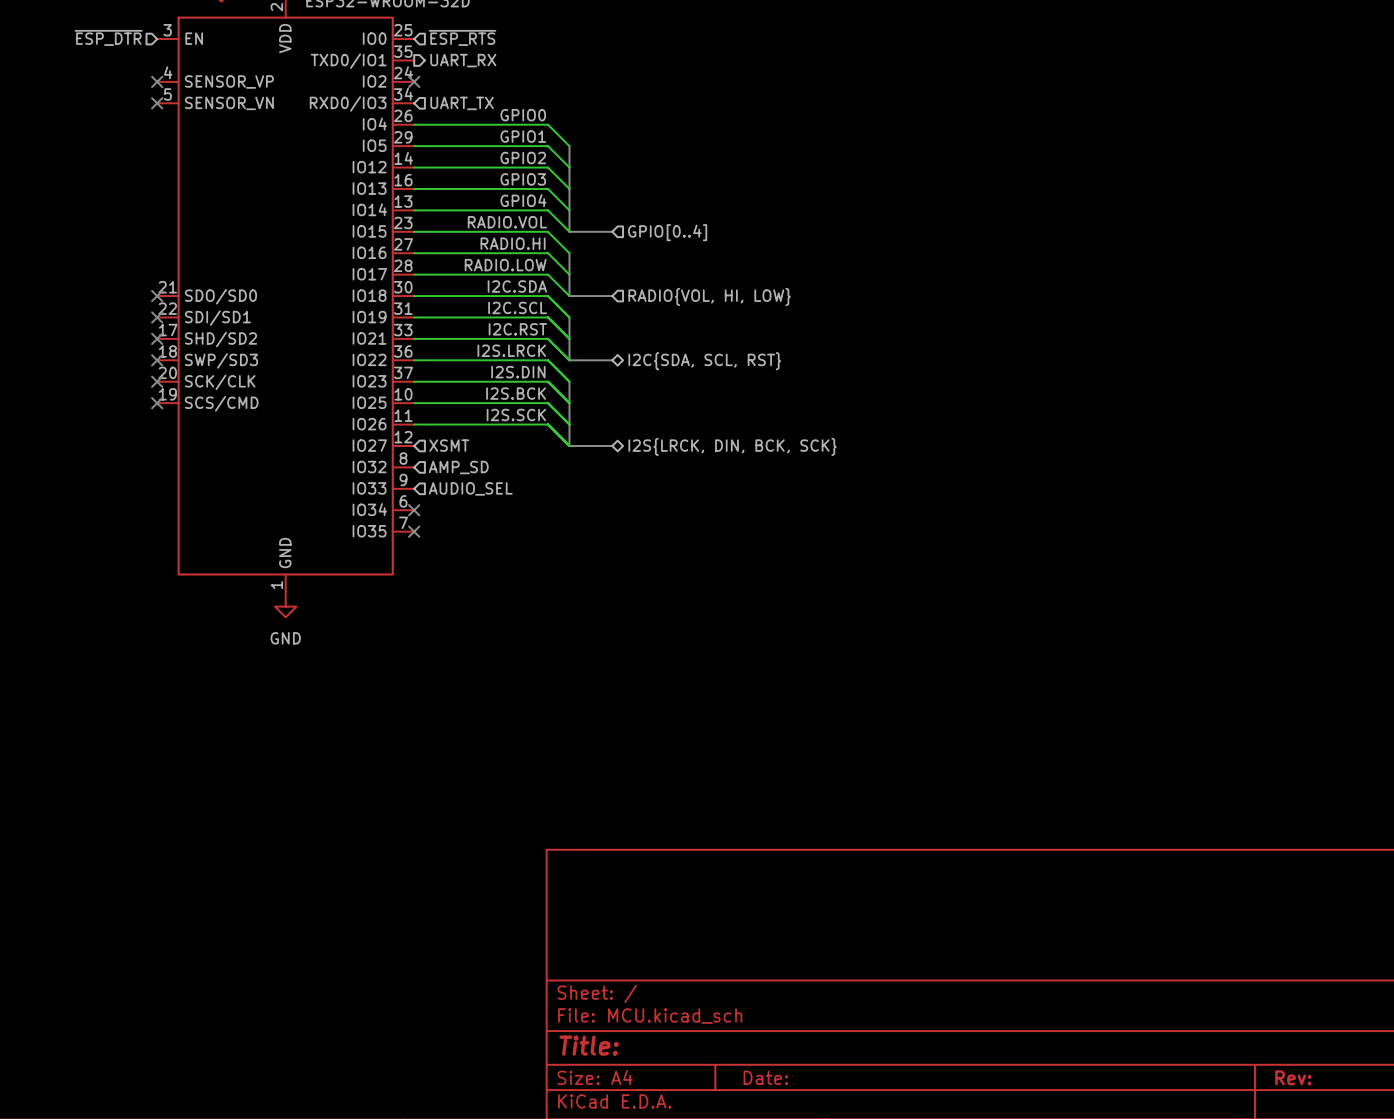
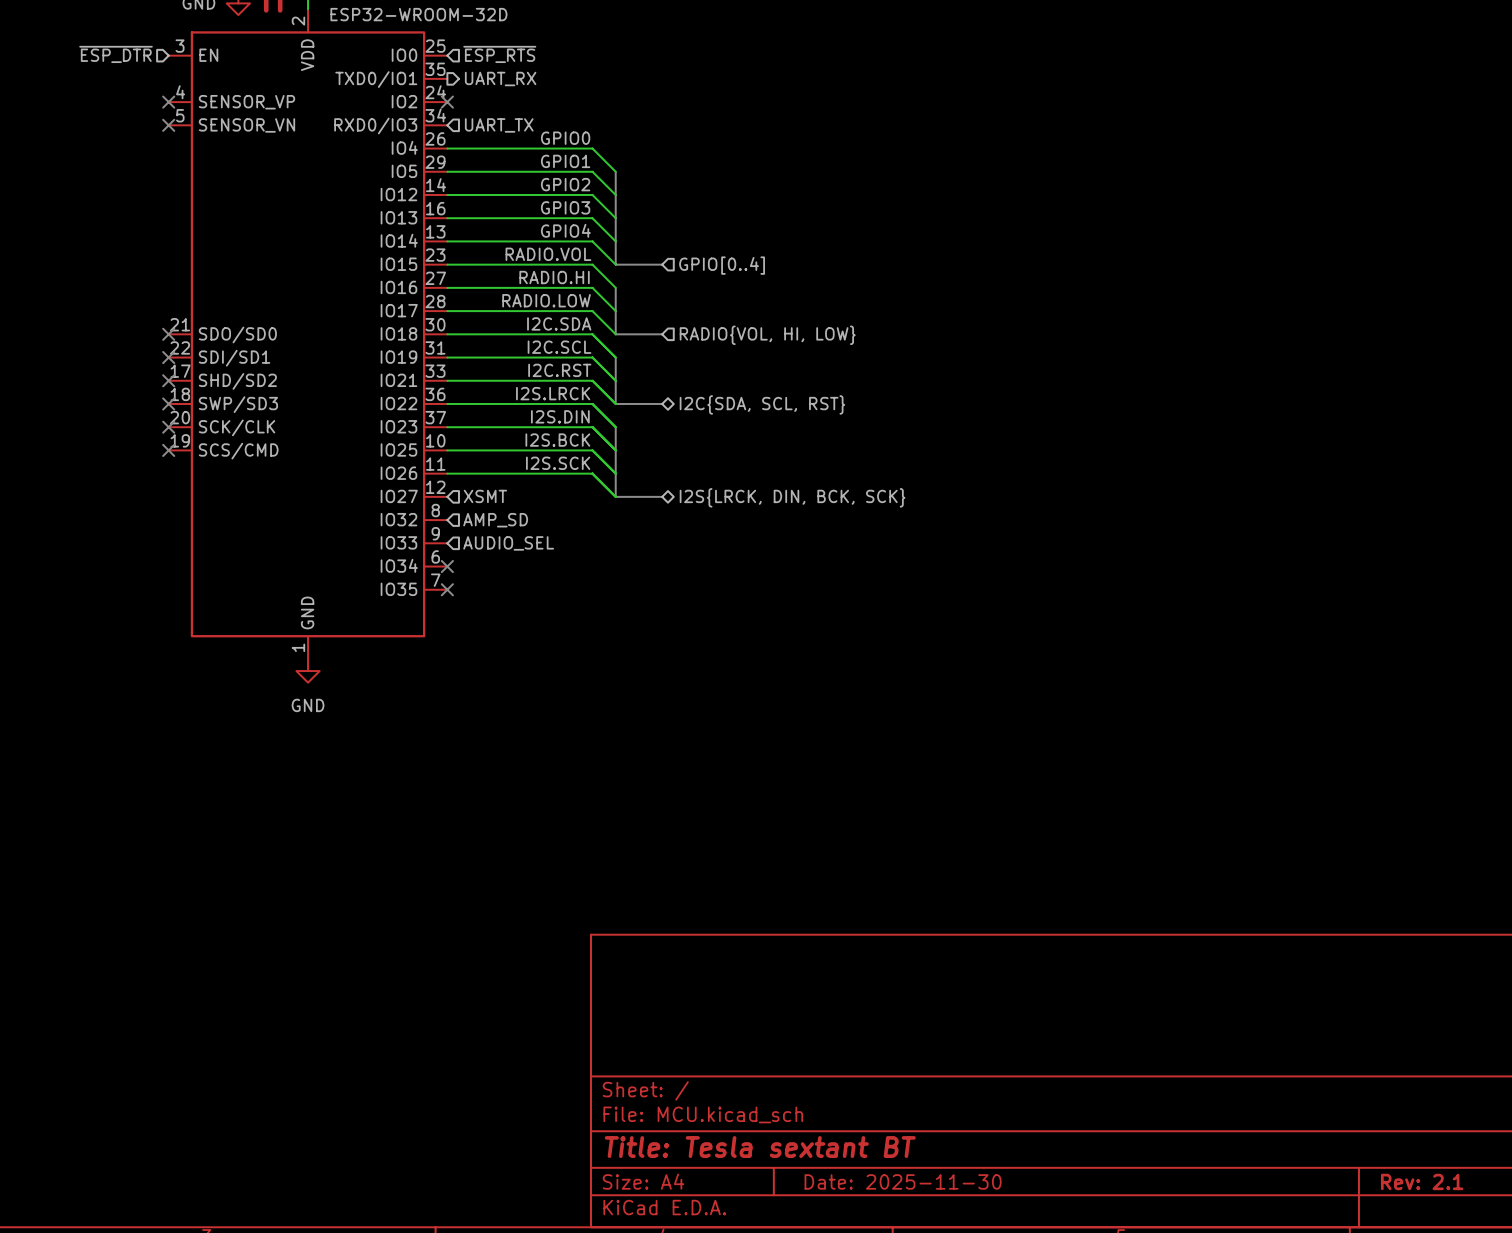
title block: Title: (589, 1045) -> Title: Tesla sextant BT (760, 1147)
title block: Date: (765, 1077) -> Date: 2025-11-30 (903, 1181)
title block: Rev: (1293, 1077) -> Rev: 2.1 (1422, 1181)

